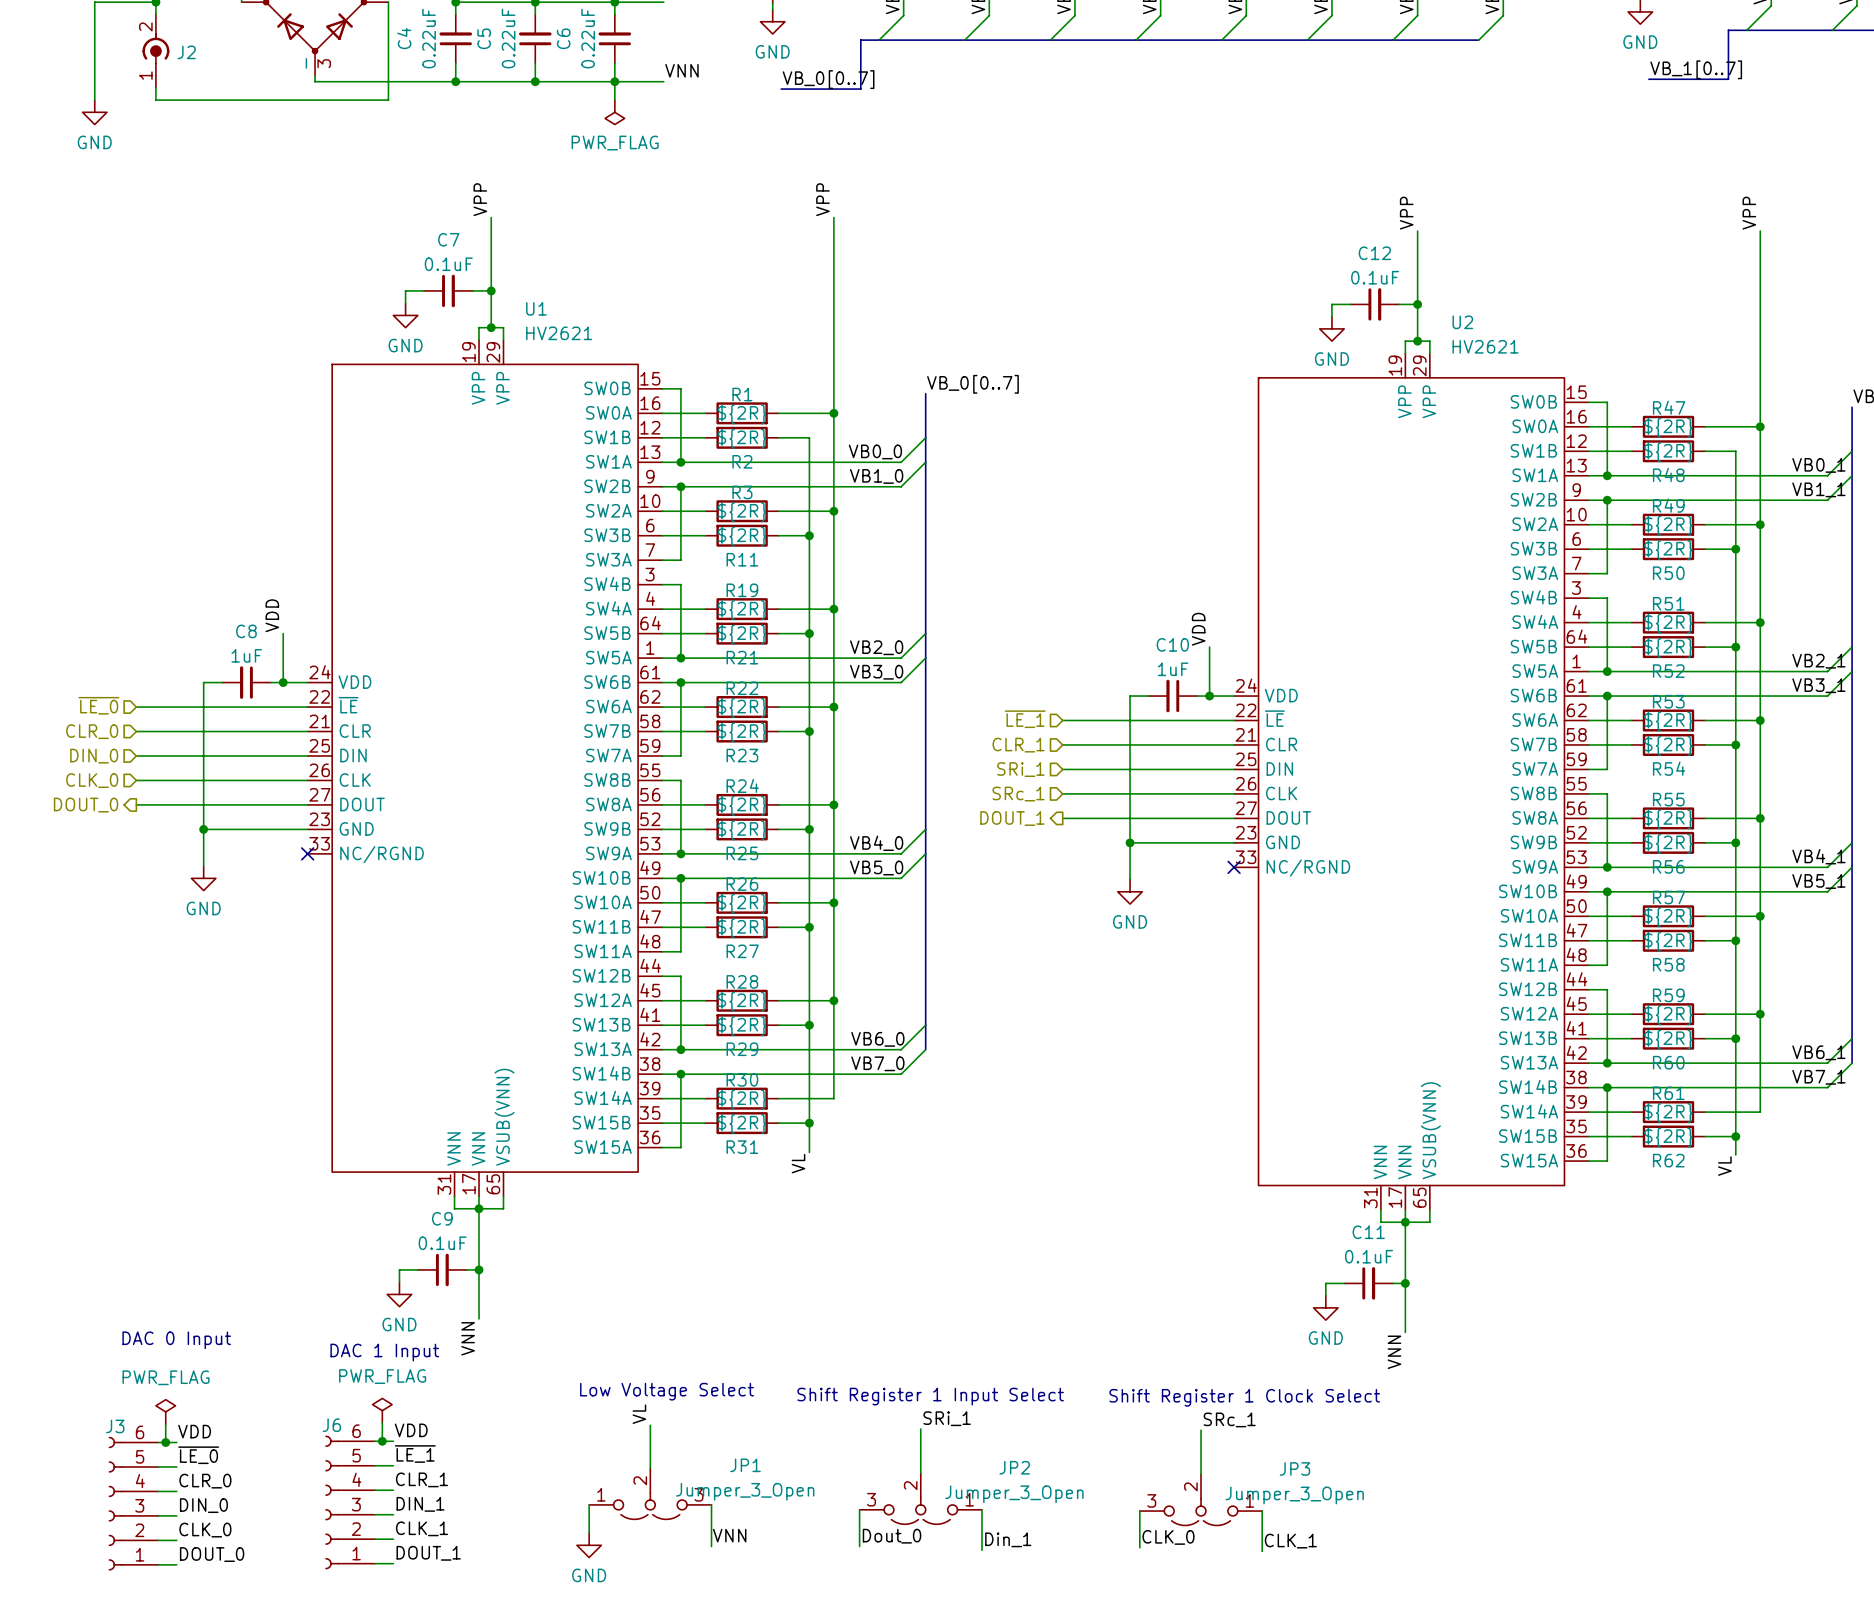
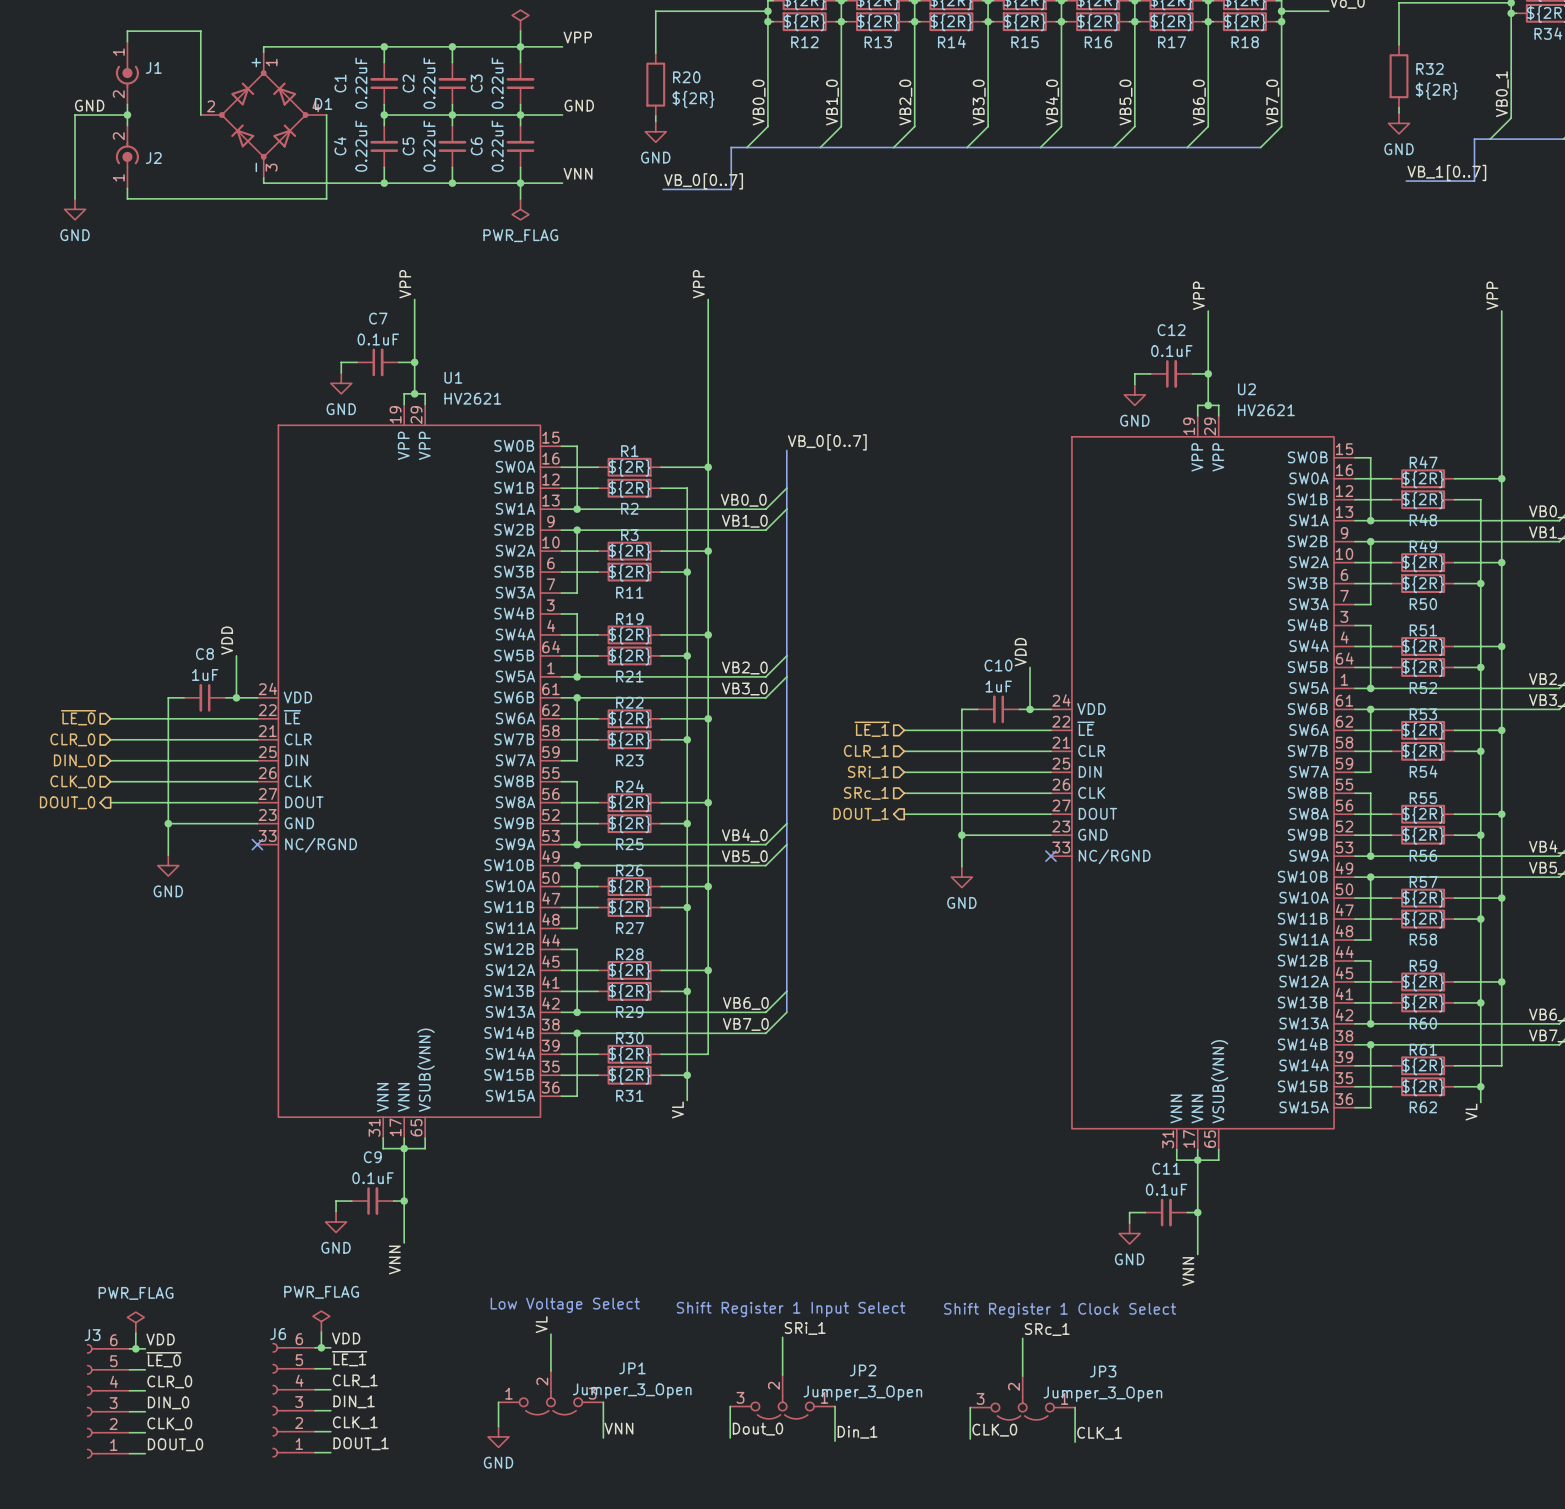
text: DAC 0 Input (176, 1340) -> none
text: DAC 1 Input (384, 1352) -> none

